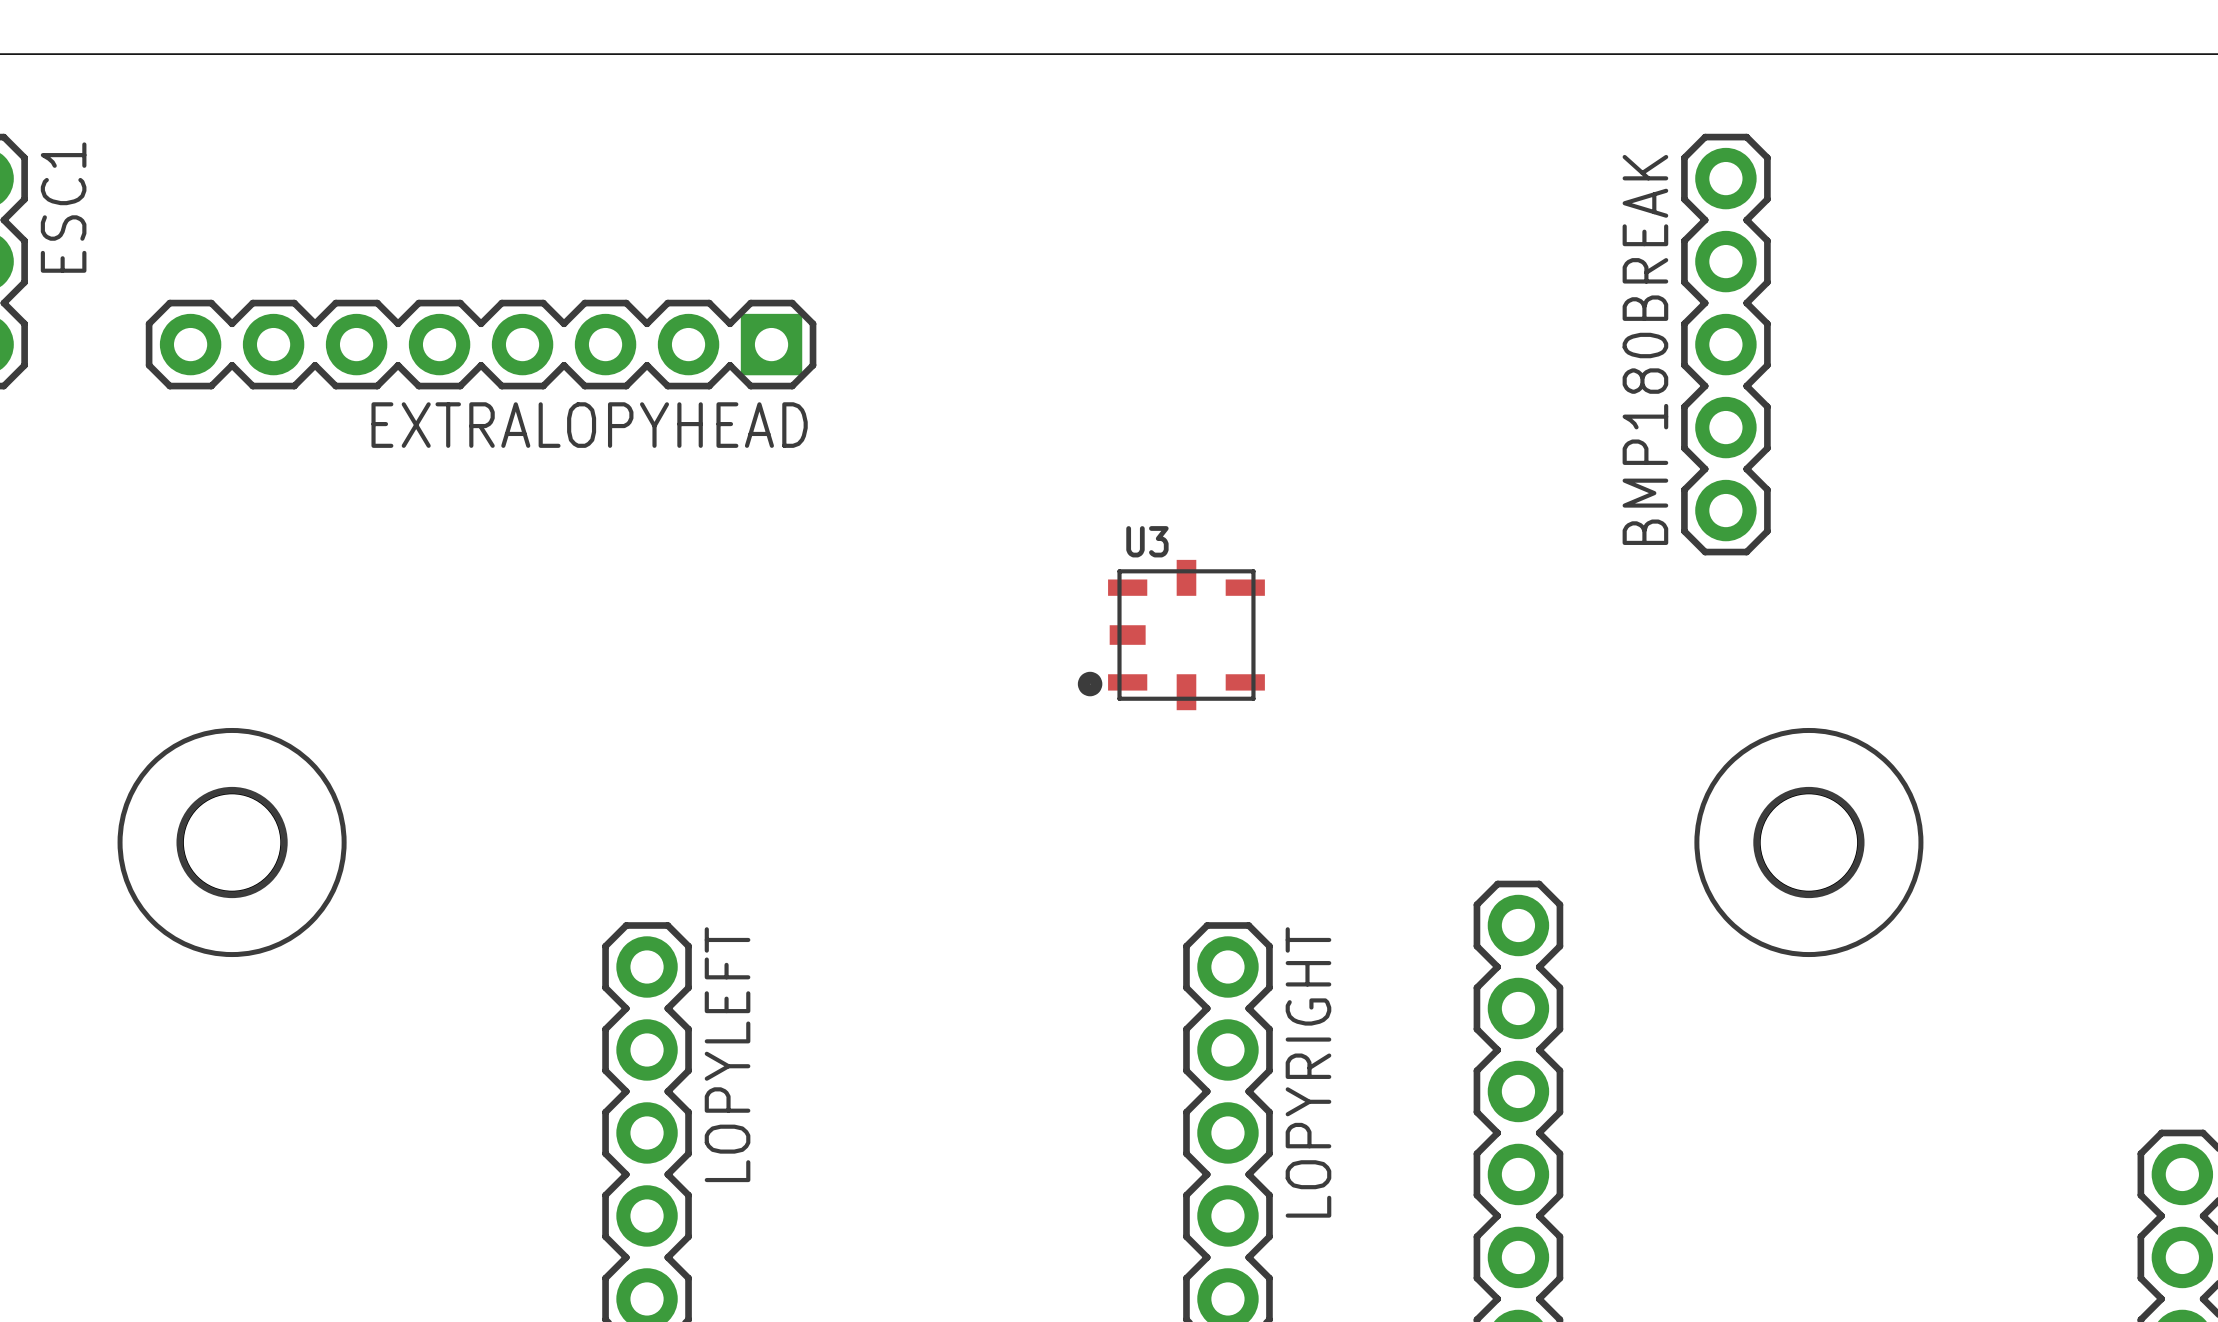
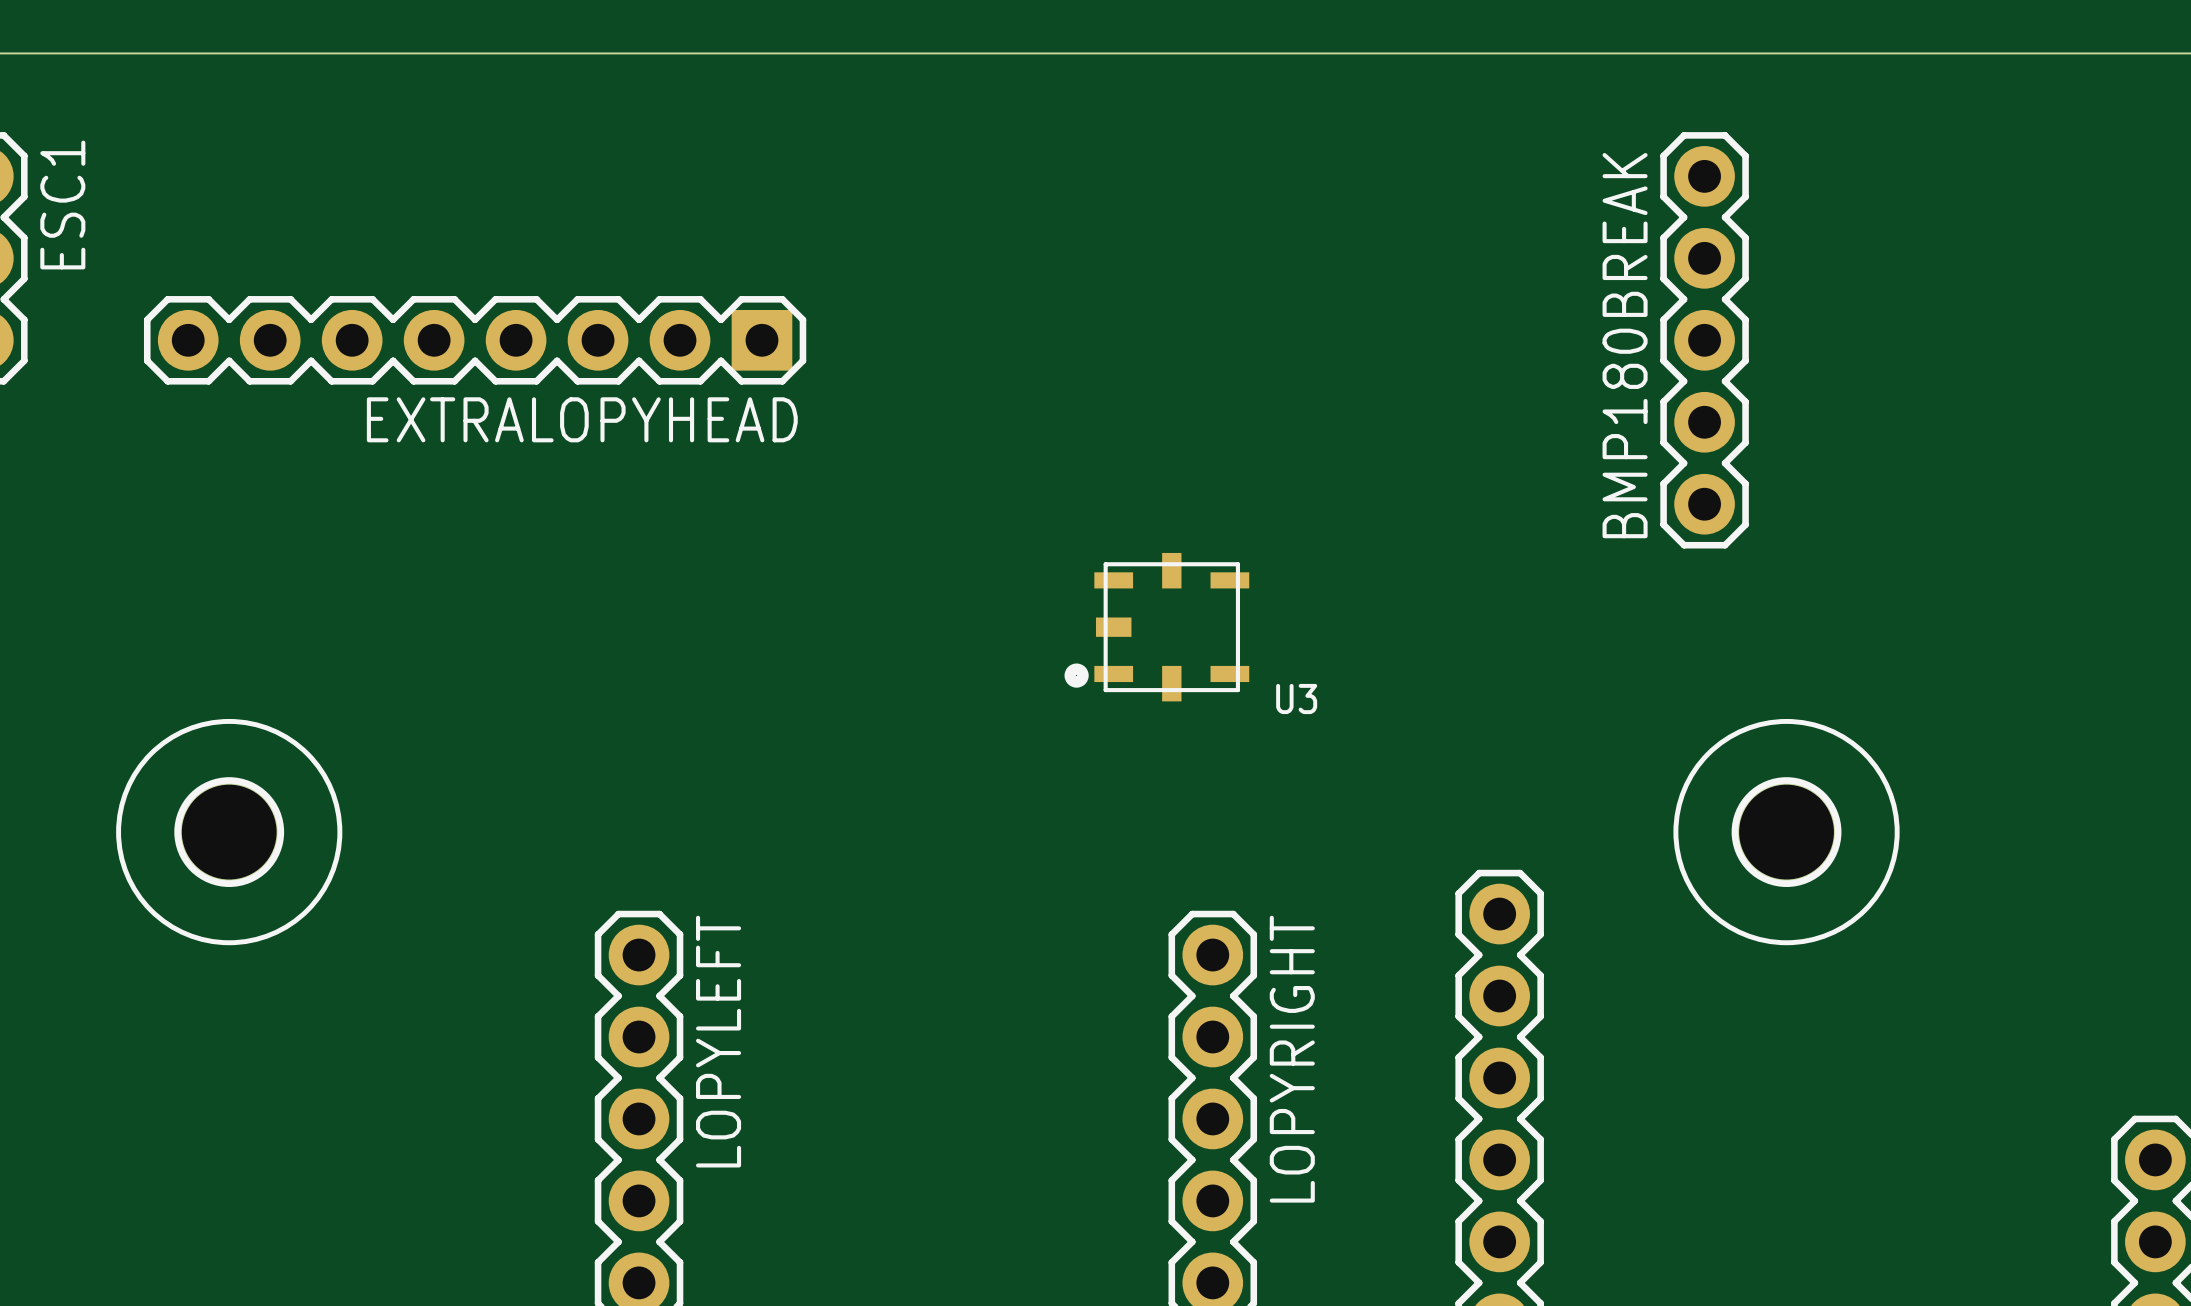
U3 name position: U3 (1147, 541) -> U3 (1296, 698)

